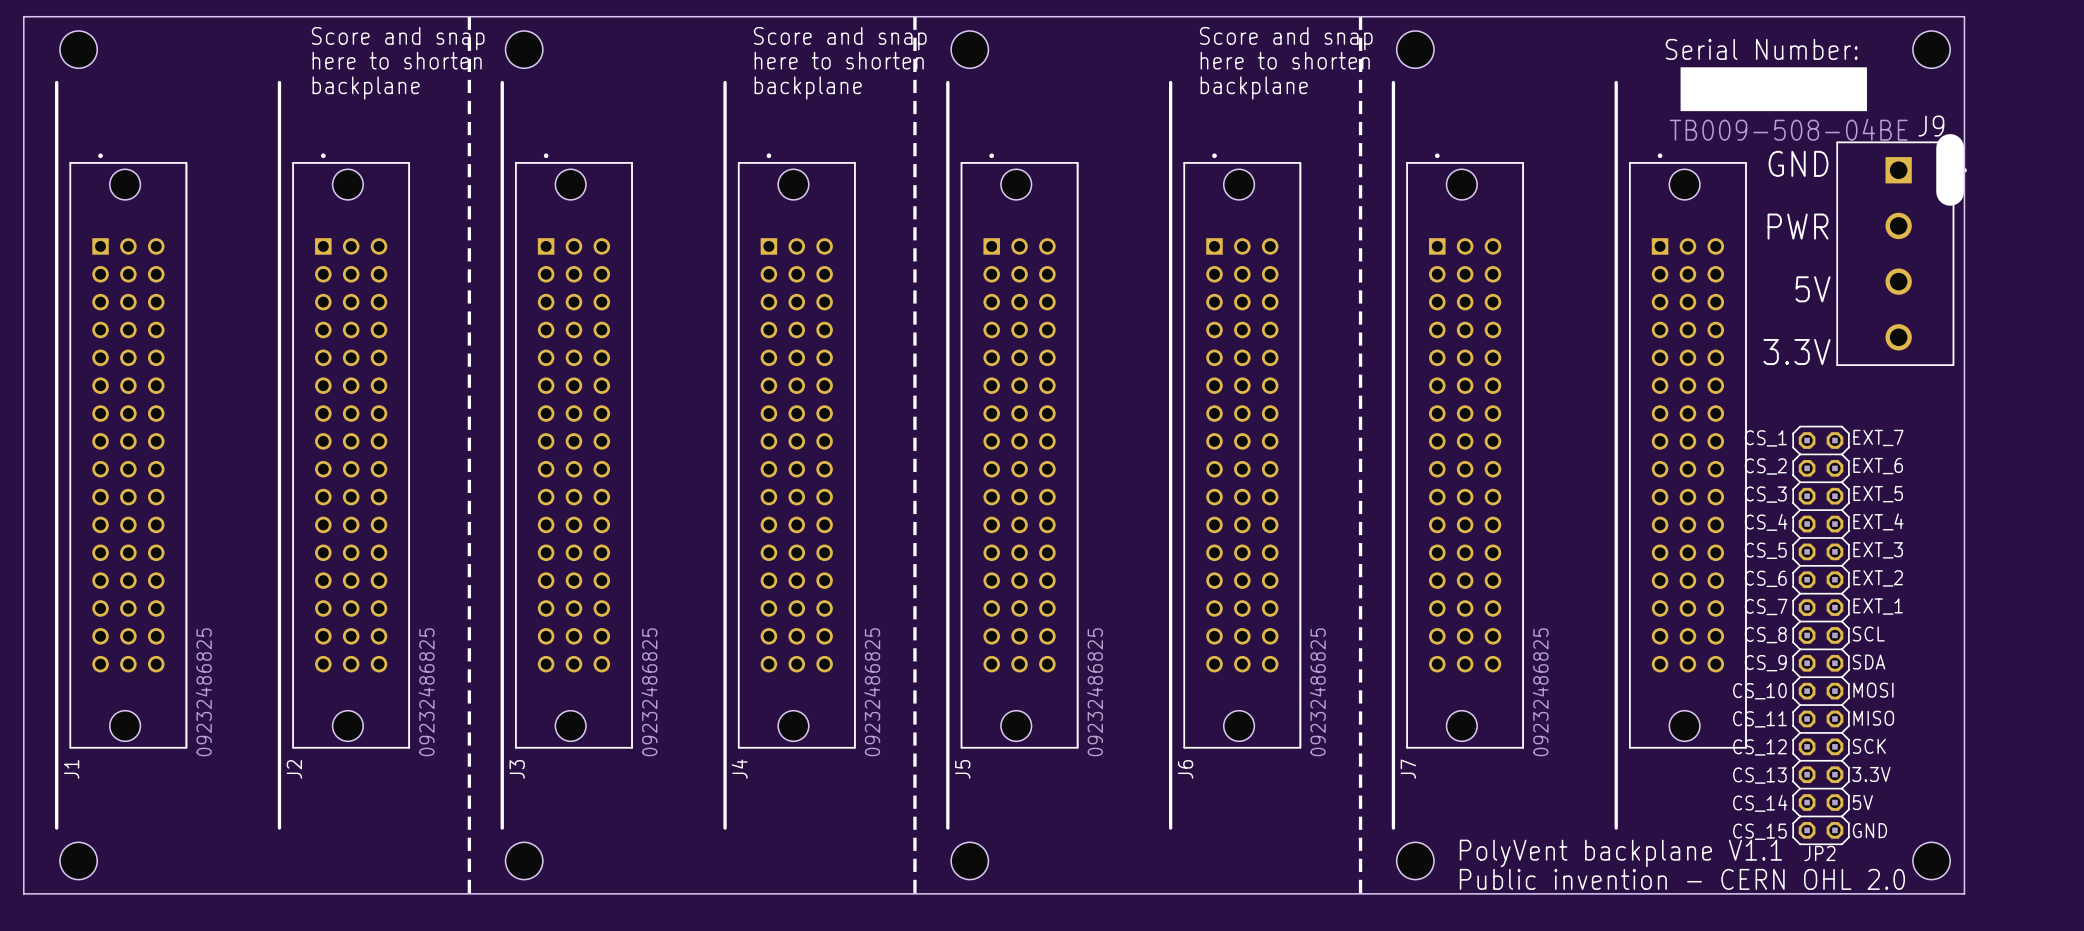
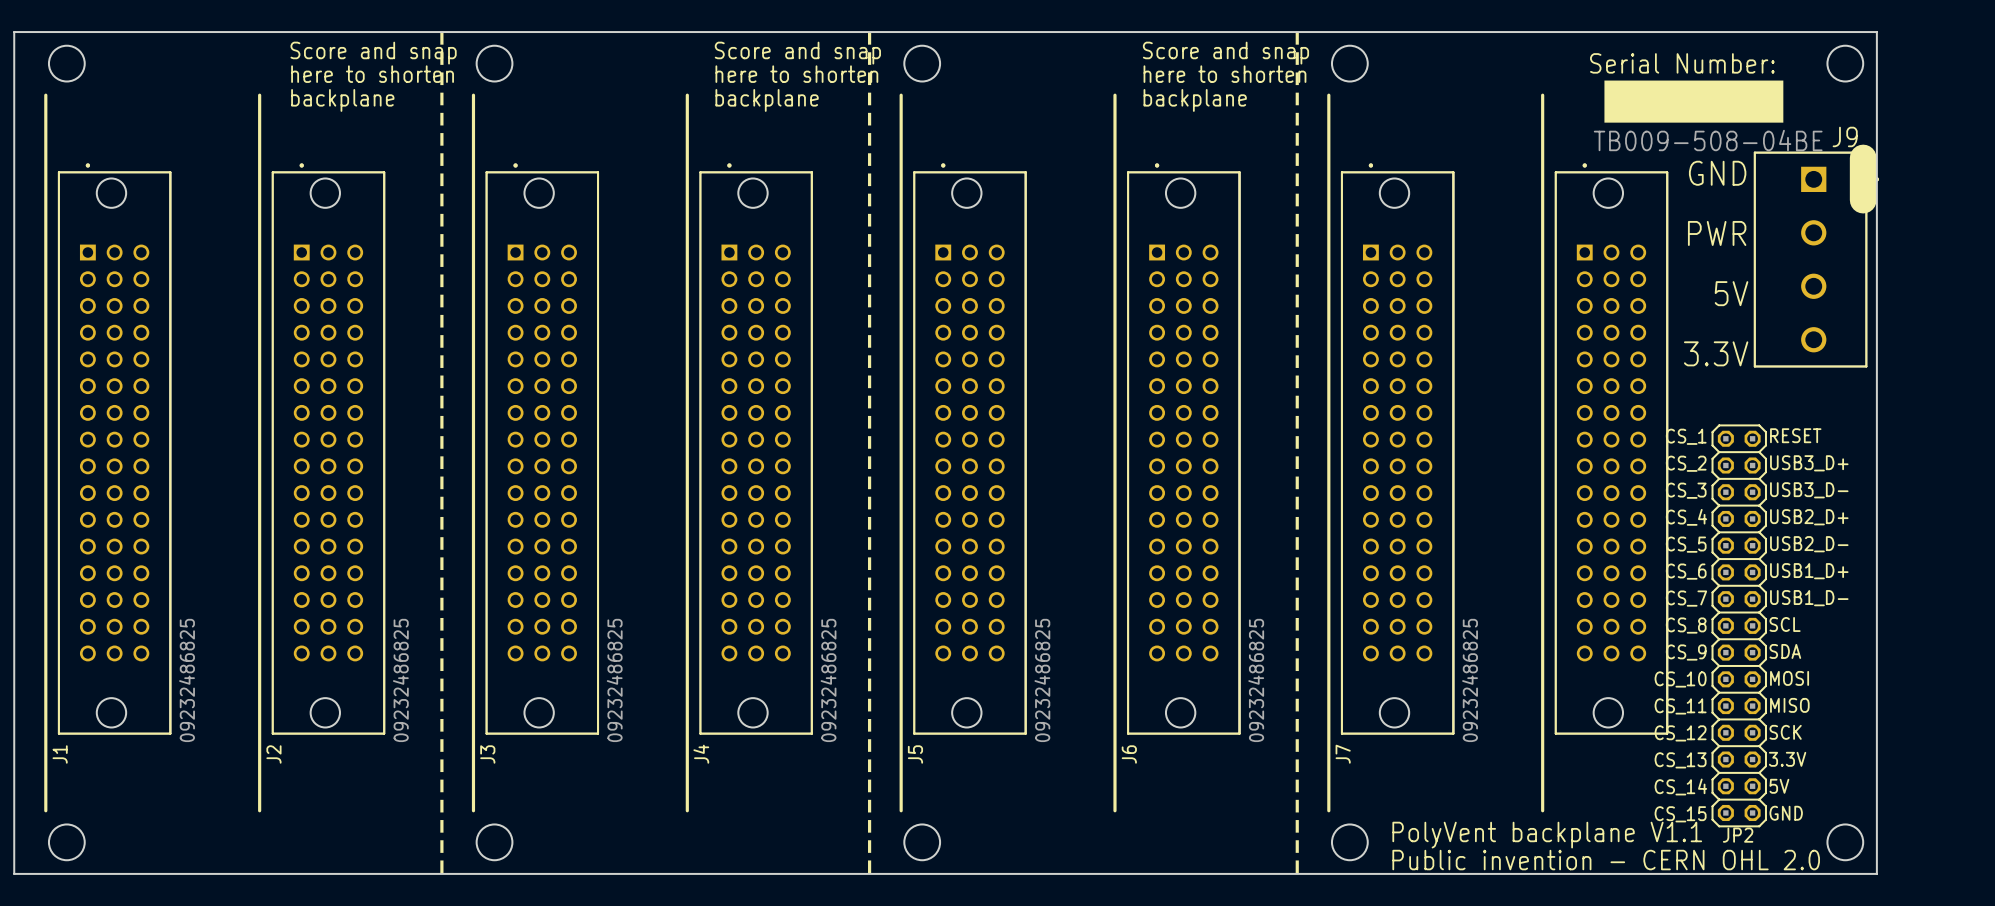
text: EXT_7 (1878, 437) -> RESET (1795, 435)
text: EXT_6 (1878, 466) -> USB3_D+ (1809, 463)
text: EXT_5 (1878, 494) -> USB3_D- (1809, 490)
text: EXT_4 (1878, 521) -> USB2_D+ (1809, 517)
text: EXT_3 (1878, 550) -> USB2_D- (1809, 544)
text: EXT_2 (1878, 578) -> USB1_D+ (1809, 571)
text: EXT_1 (1878, 606) -> USB1_D- (1809, 598)

